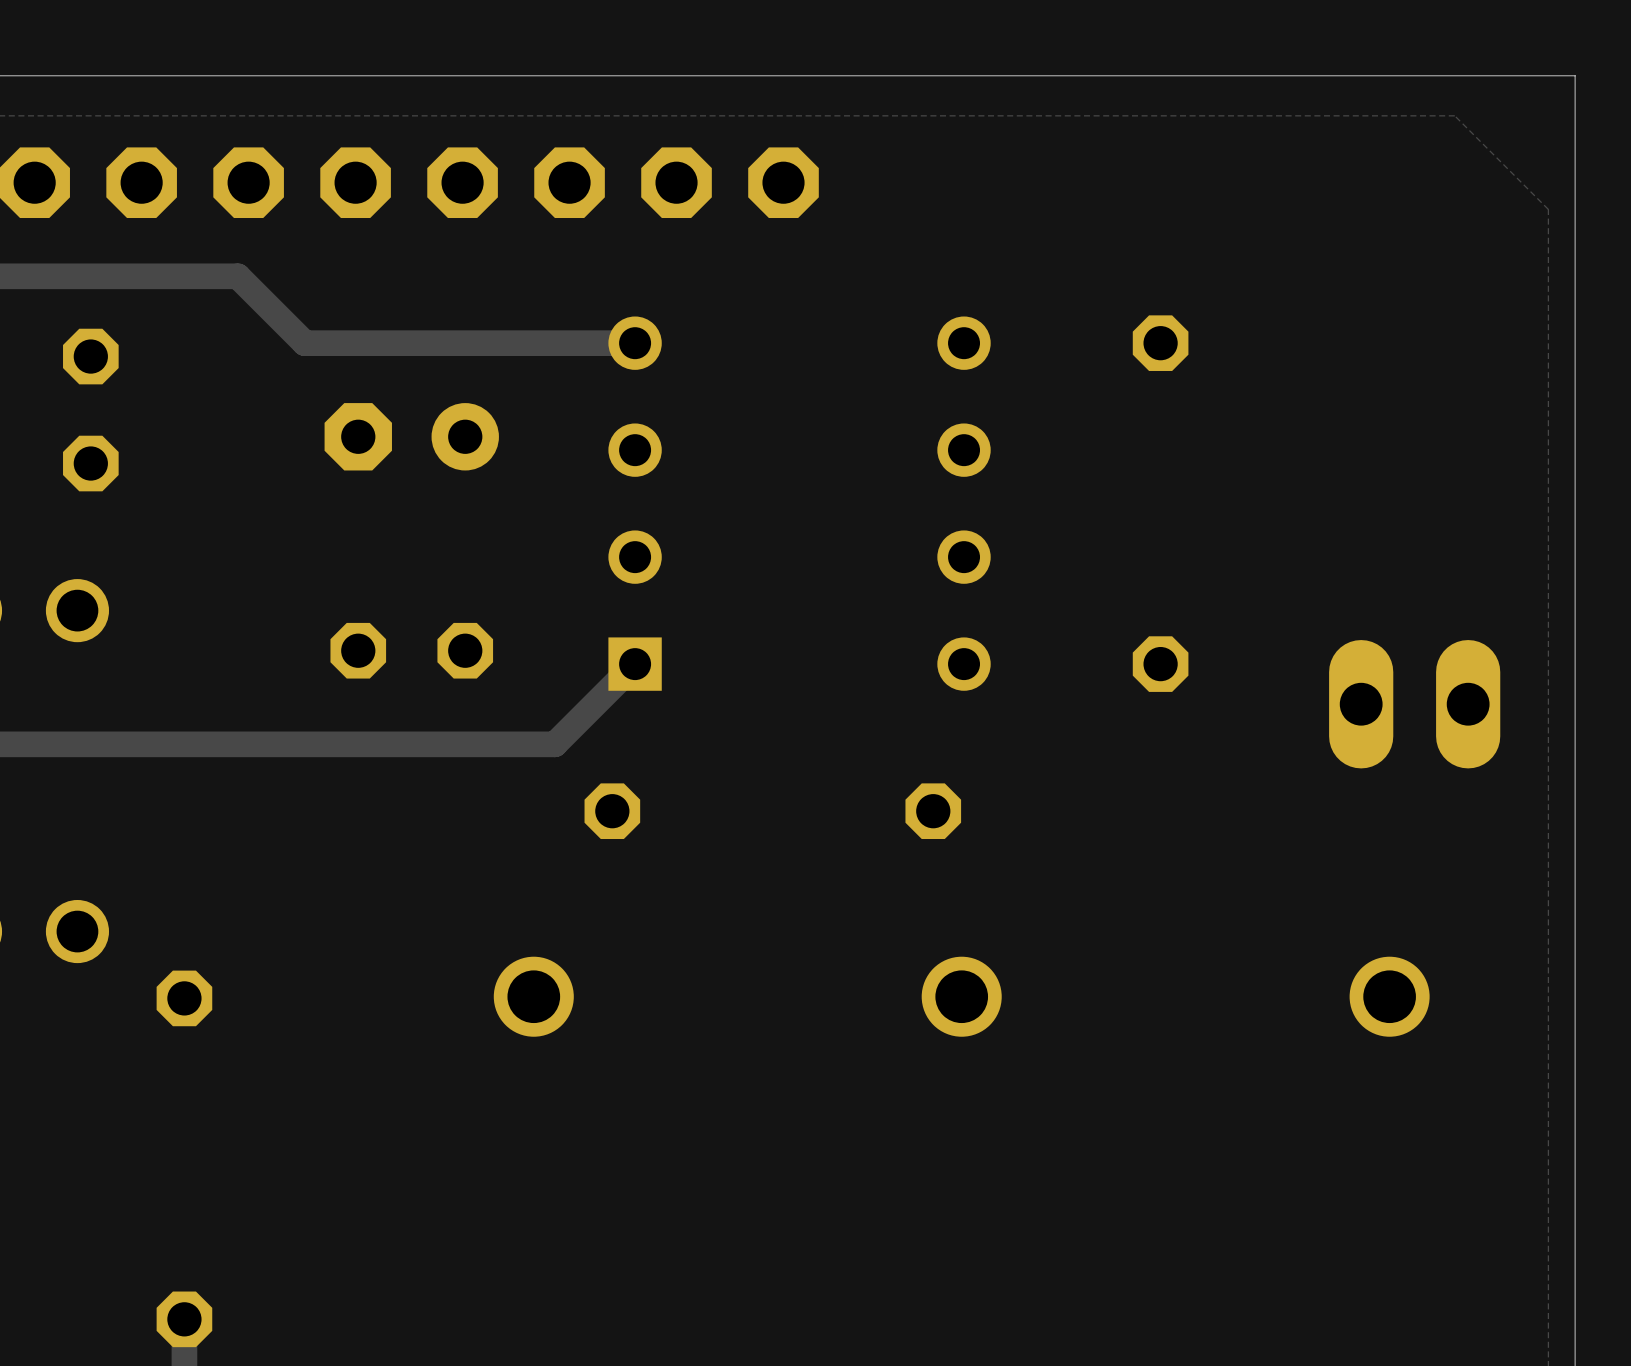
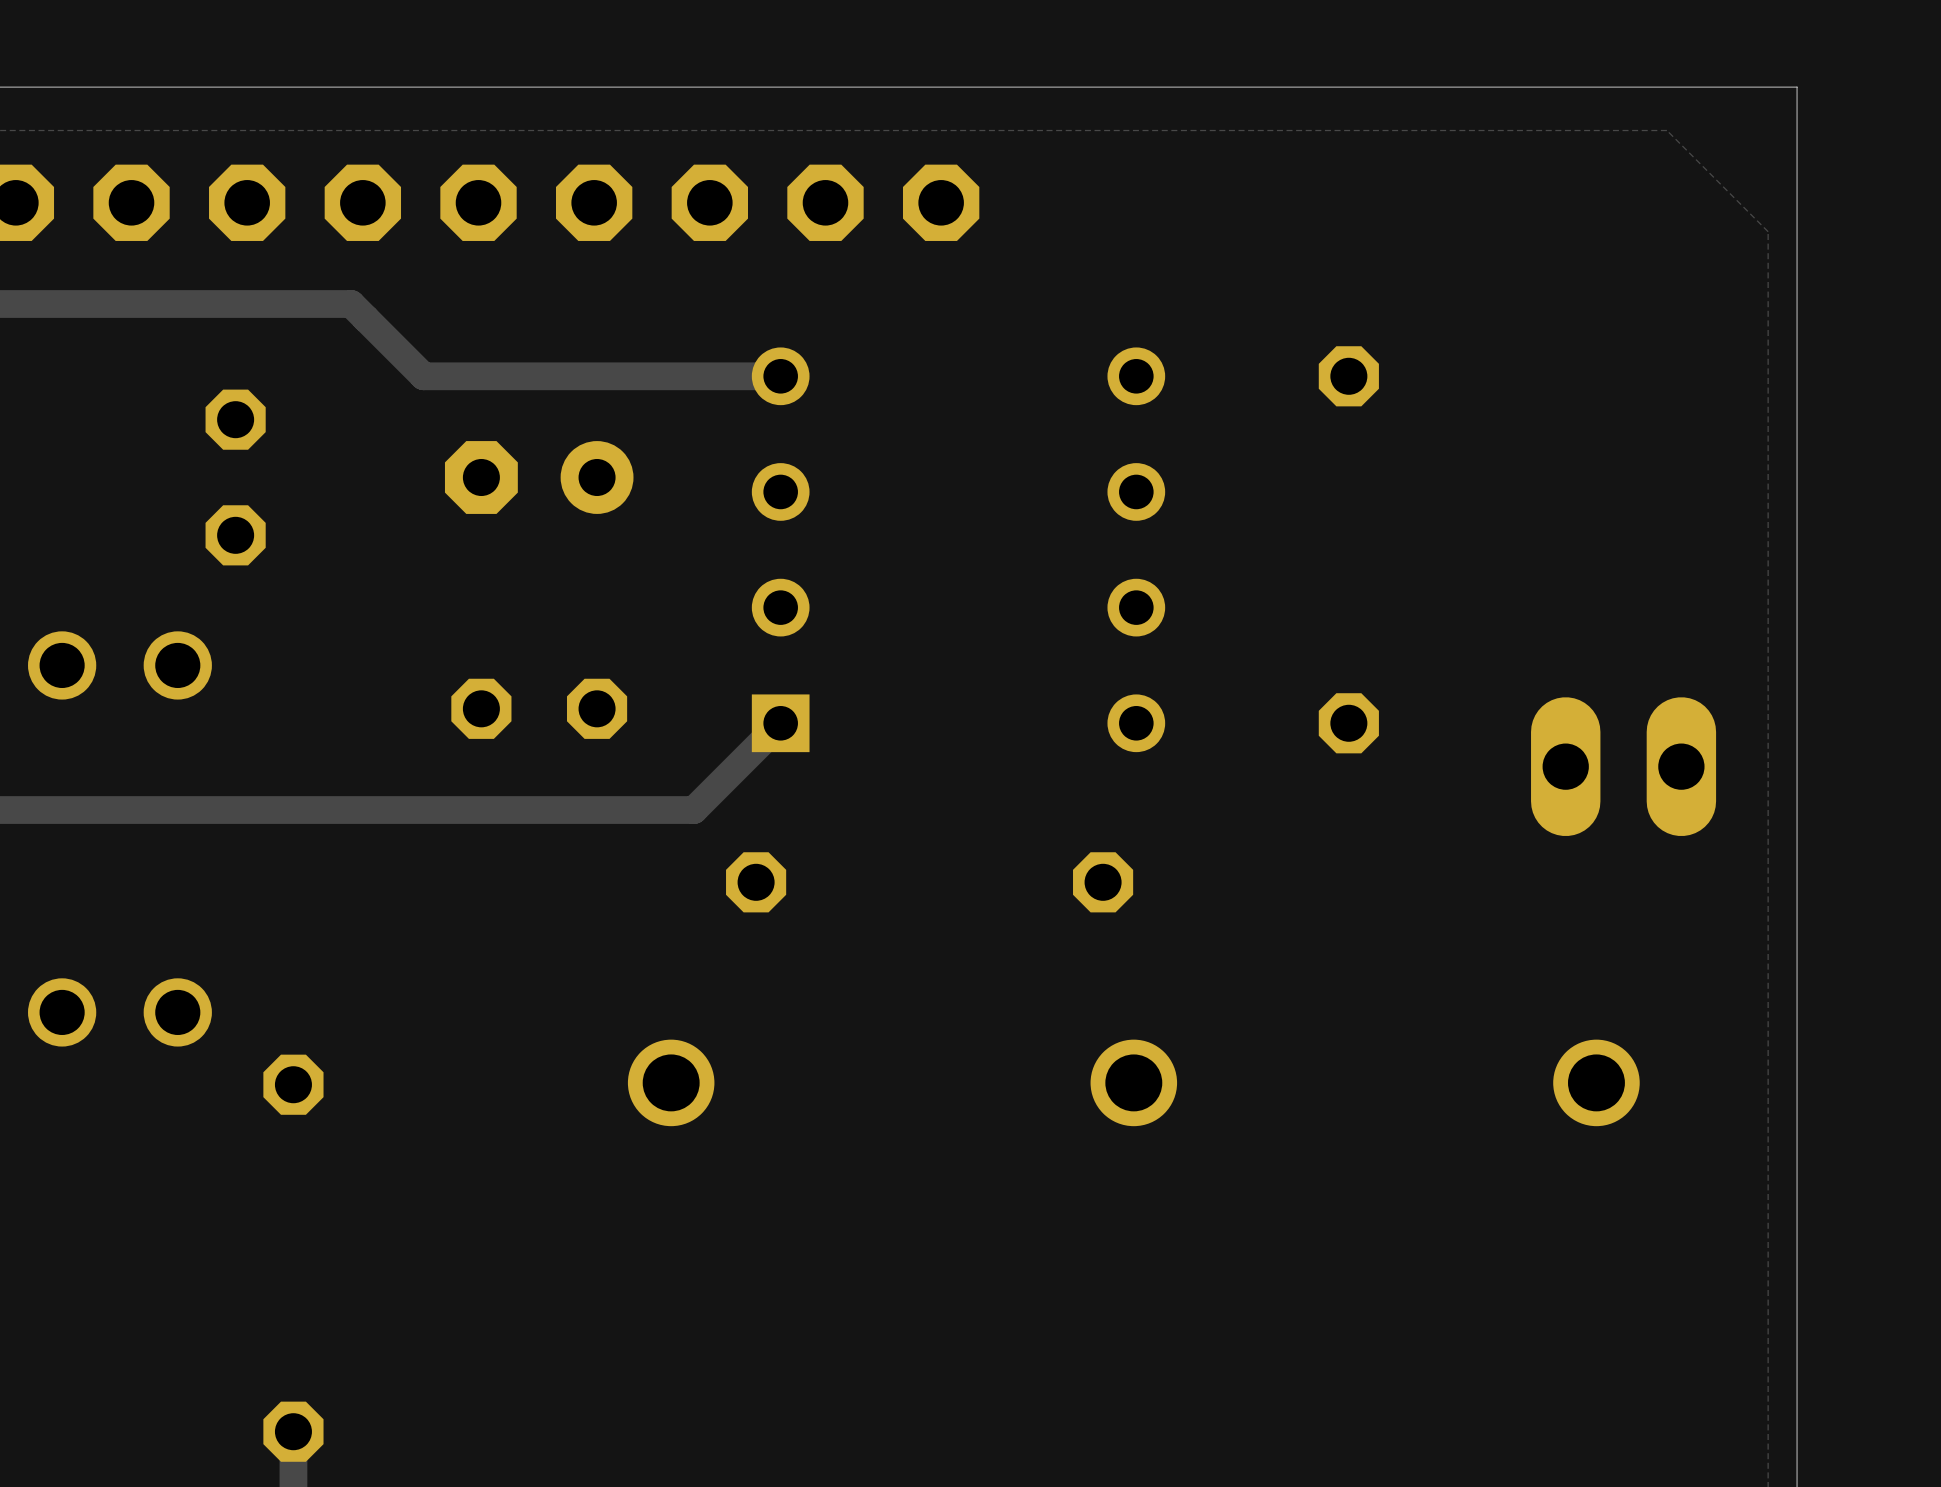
part position: (90, 410) -> (235, 477)

